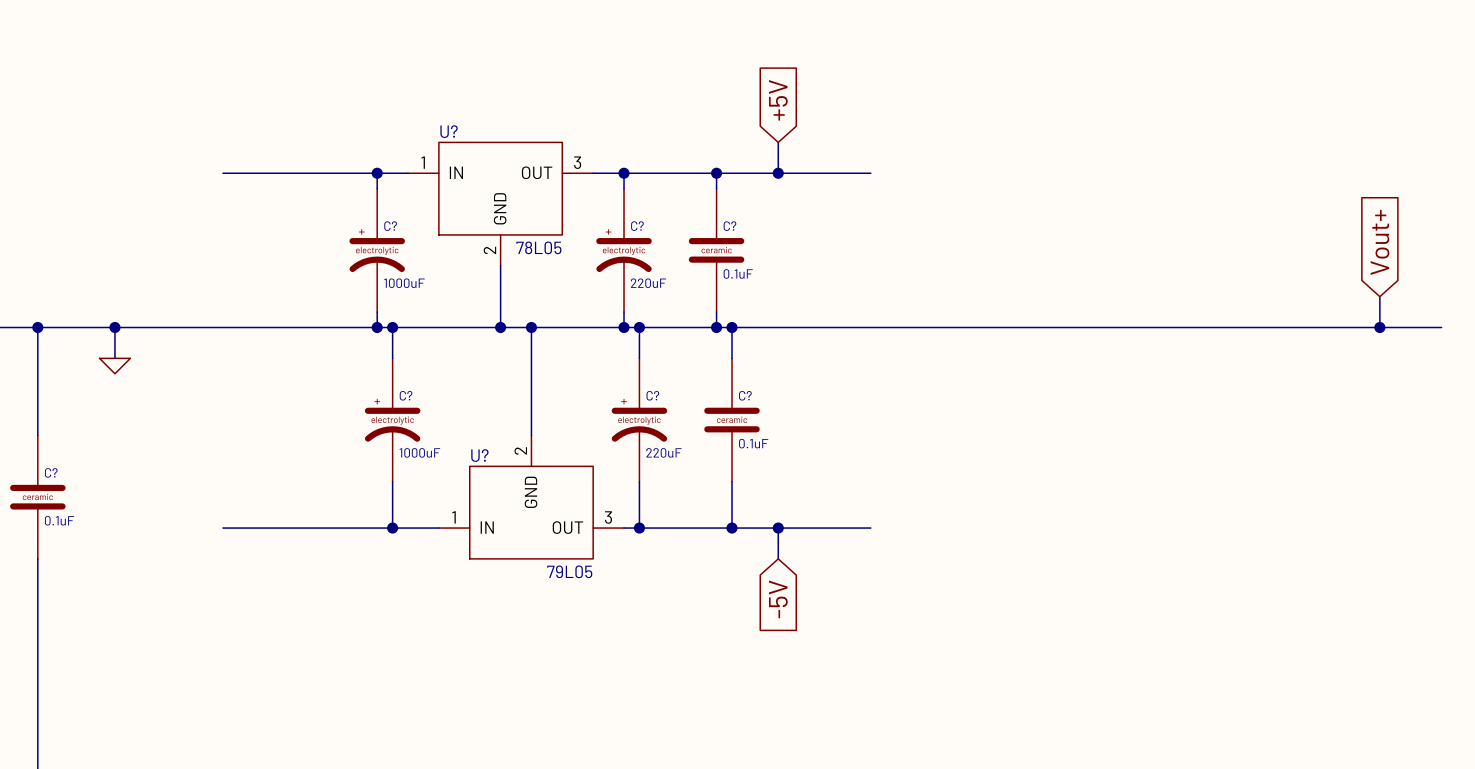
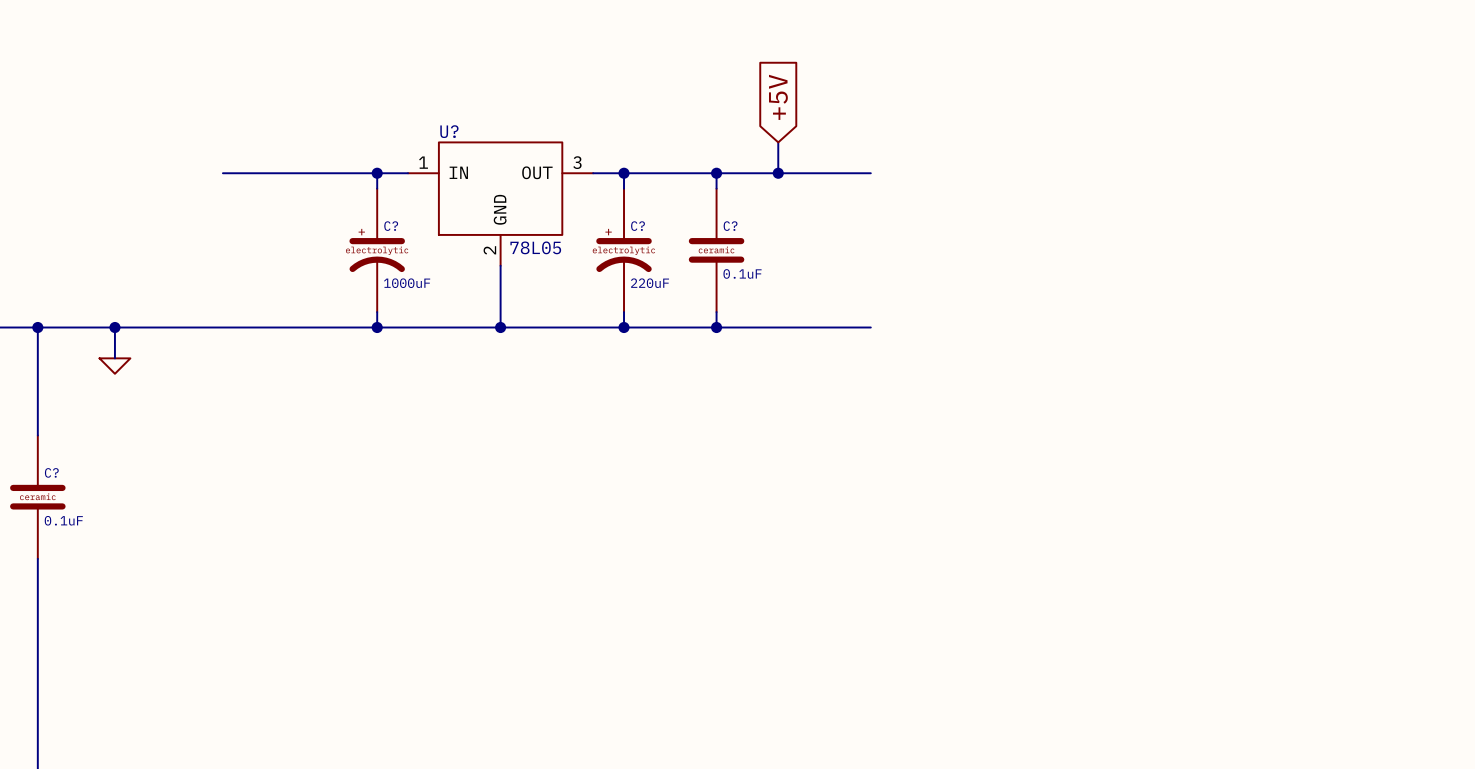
global label: Vout+ (1379, 242) -> none
wire: (1379, 296) (1379, 327) -> none
wire: (392, 327) (392, 358) -> none
junction: (392, 327) -> none
wire: (531, 327) (531, 435) -> none
junction: (531, 327) -> none
wire: (639, 327) (639, 358) -> none
junction: (639, 327) -> none
wire: (731, 327) (731, 358) -> none
junction: (731, 327) -> none
wire: (870, 327) (1441, 327) -> none
junction: (1379, 327) -> none
C?: 1000uF (392, 420) -> none
C?: 220uF (639, 420) -> none
C?: 0.1uF (731, 420) -> none
wire: (392, 481) (392, 528) -> none
wire: (639, 481) (639, 528) -> none
wire: (731, 481) (731, 528) -> none
U?: 79L05 (531, 497) -> none
wire: (222, 528) (438, 528) -> none
junction: (392, 528) -> none
wire: (624, 528) (870, 528) -> none
junction: (639, 528) -> none
junction: (731, 528) -> none
wire: (778, 528) (778, 558) -> none
junction: (778, 528) -> none
global label: -5V (778, 599) -> none

